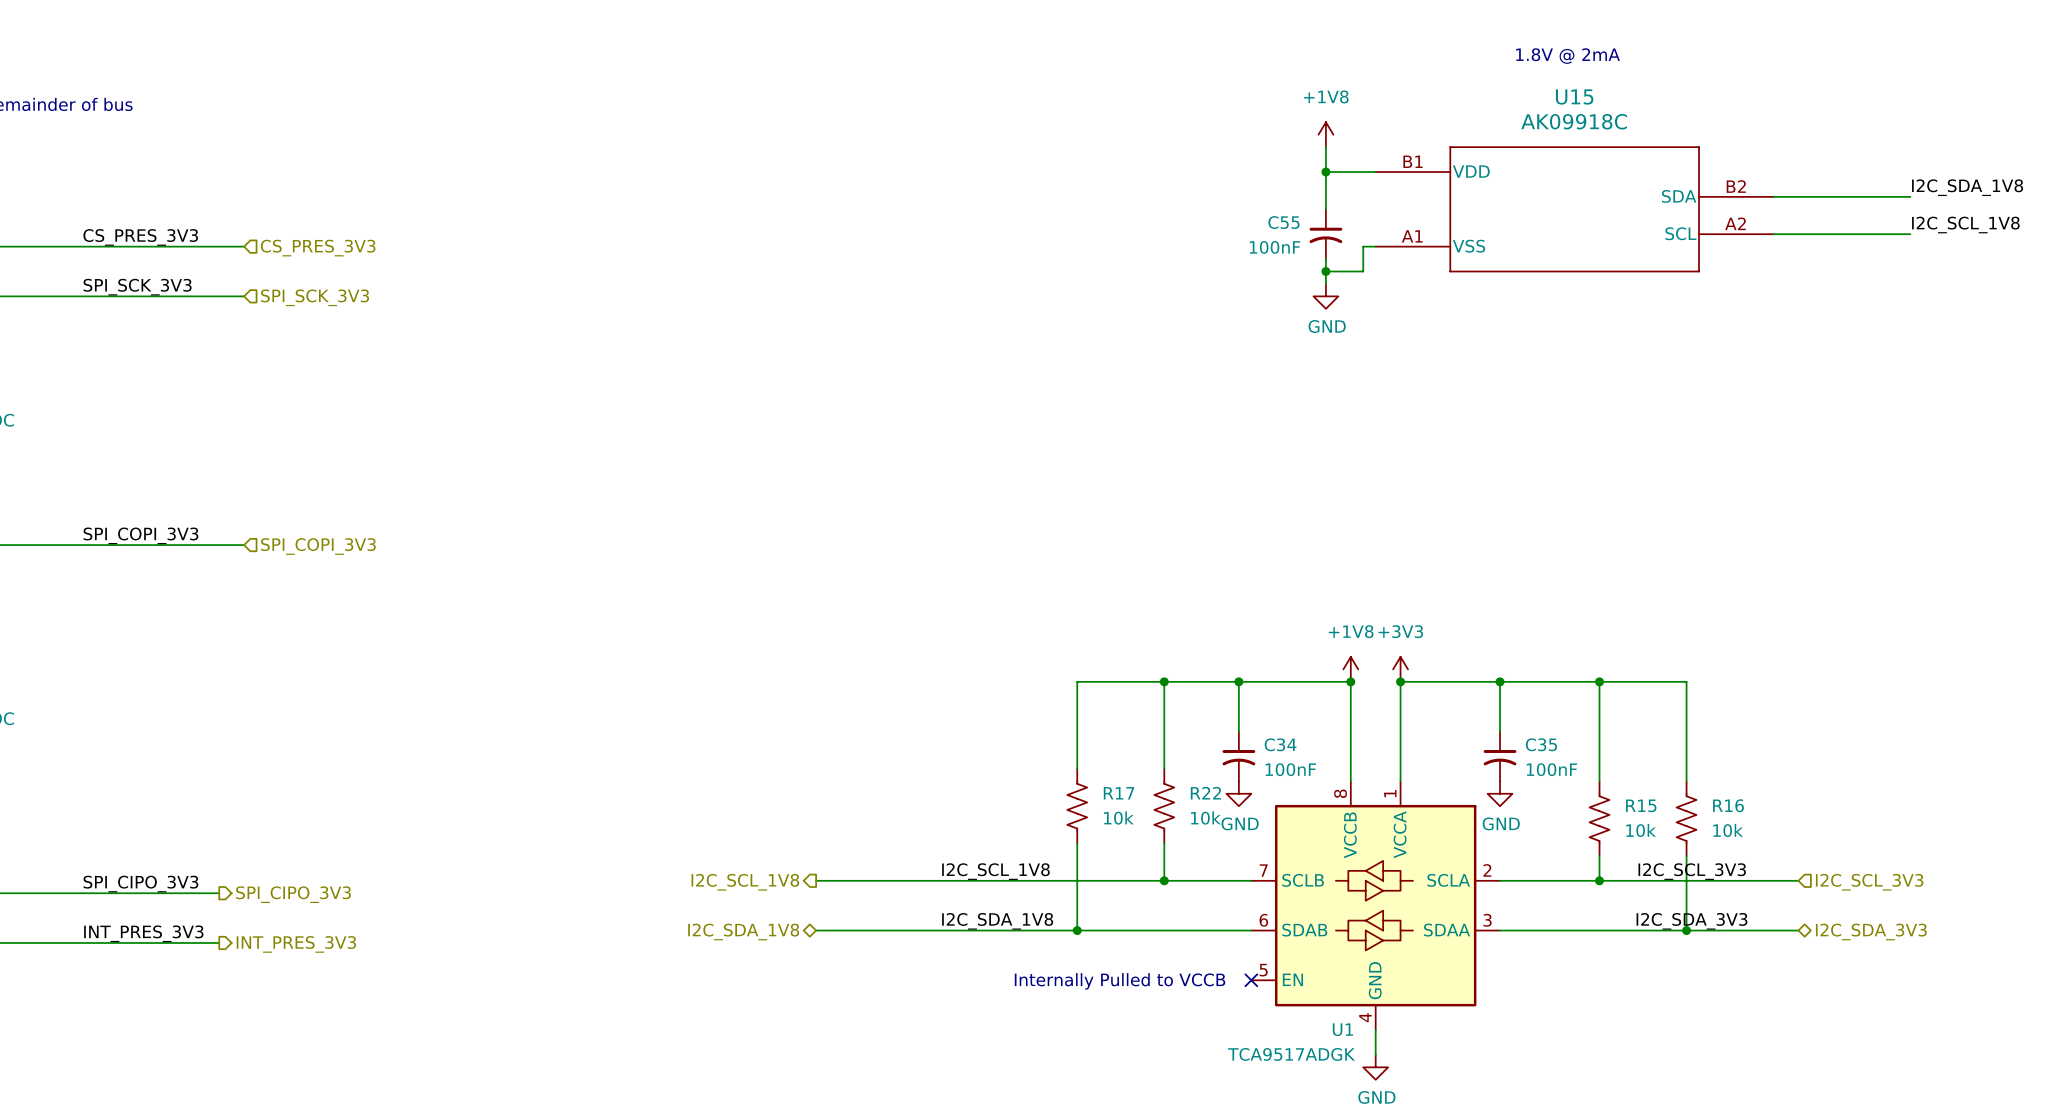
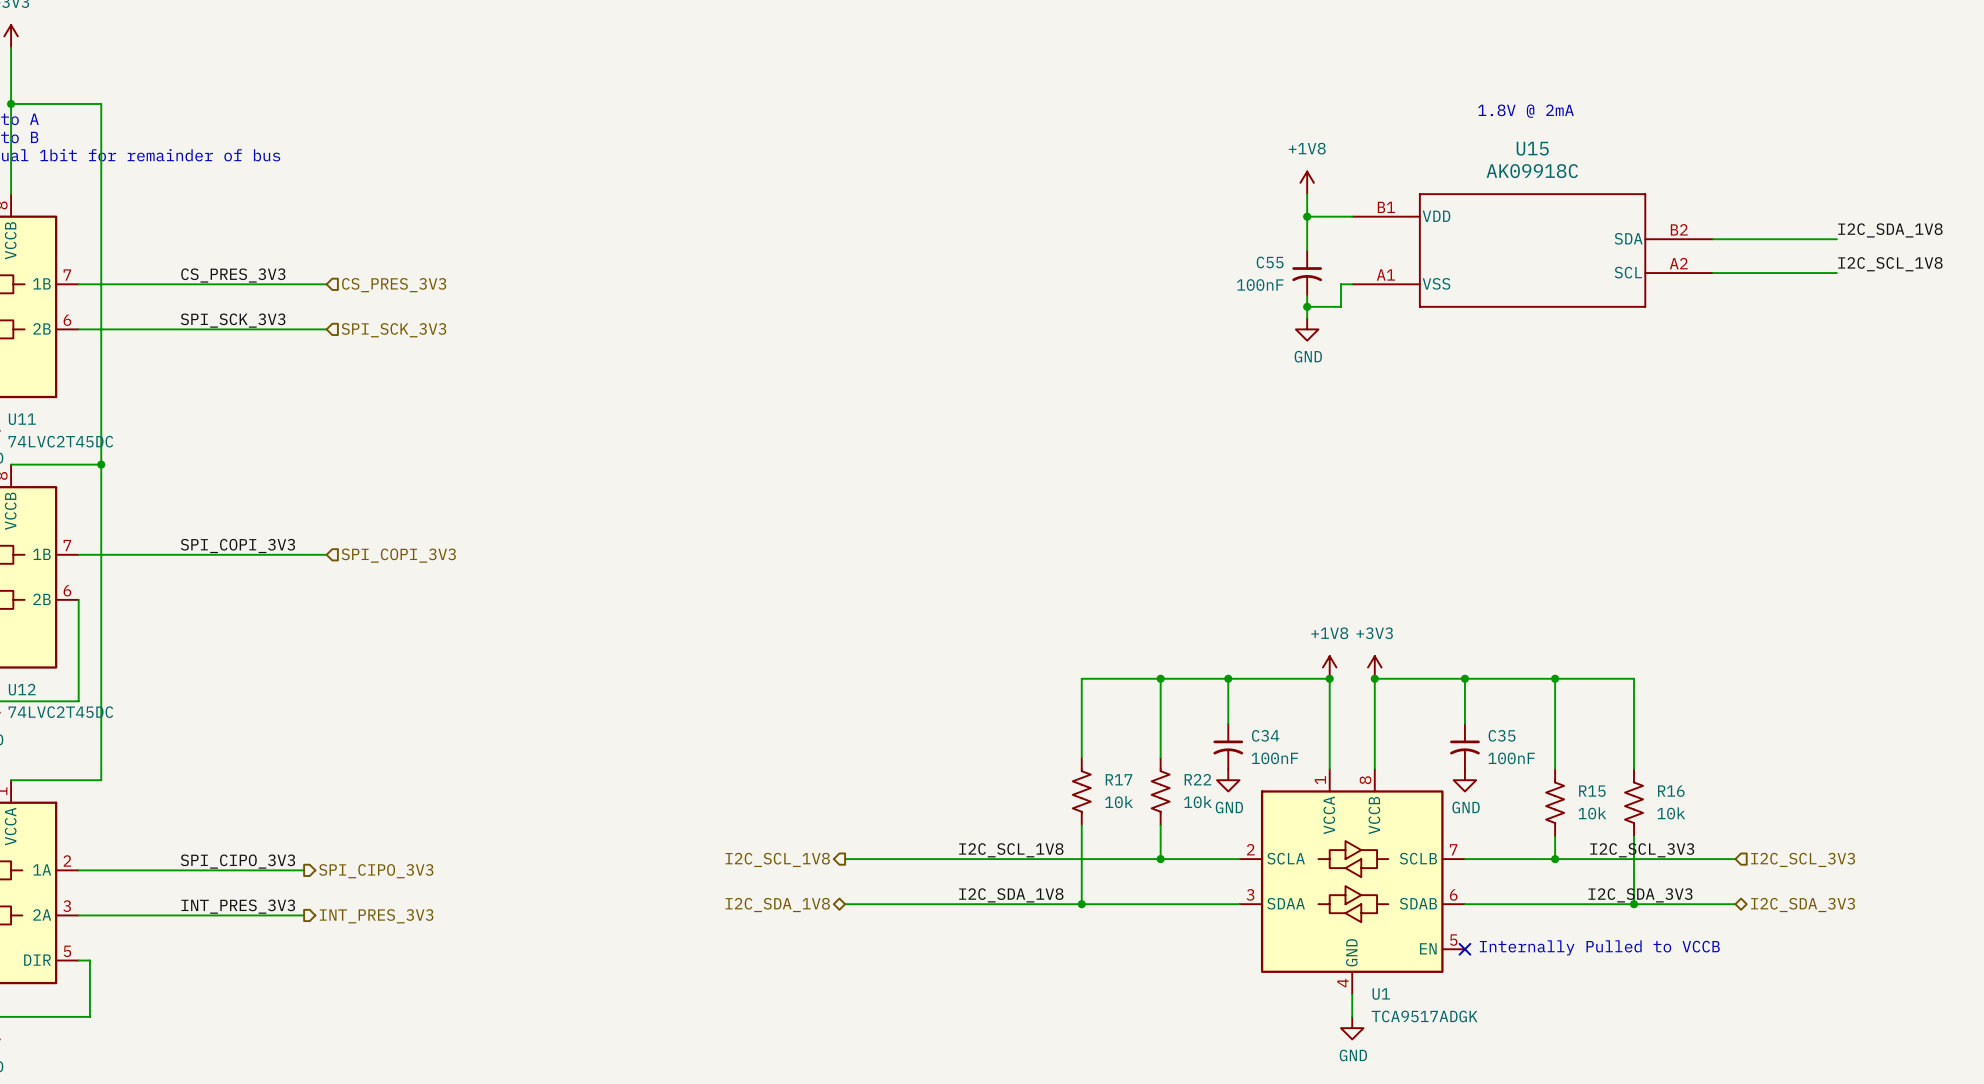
U1 flip: as is (1375, 905) -> left-right (1352, 881)
text: none -> Internally Pulled to VCCB (1599, 947)
no-connect mark: (1251, 980) -> none
no-connect mark: none -> (1464, 949)
text: Internally Pulled to VCCB (1120, 981) -> none

